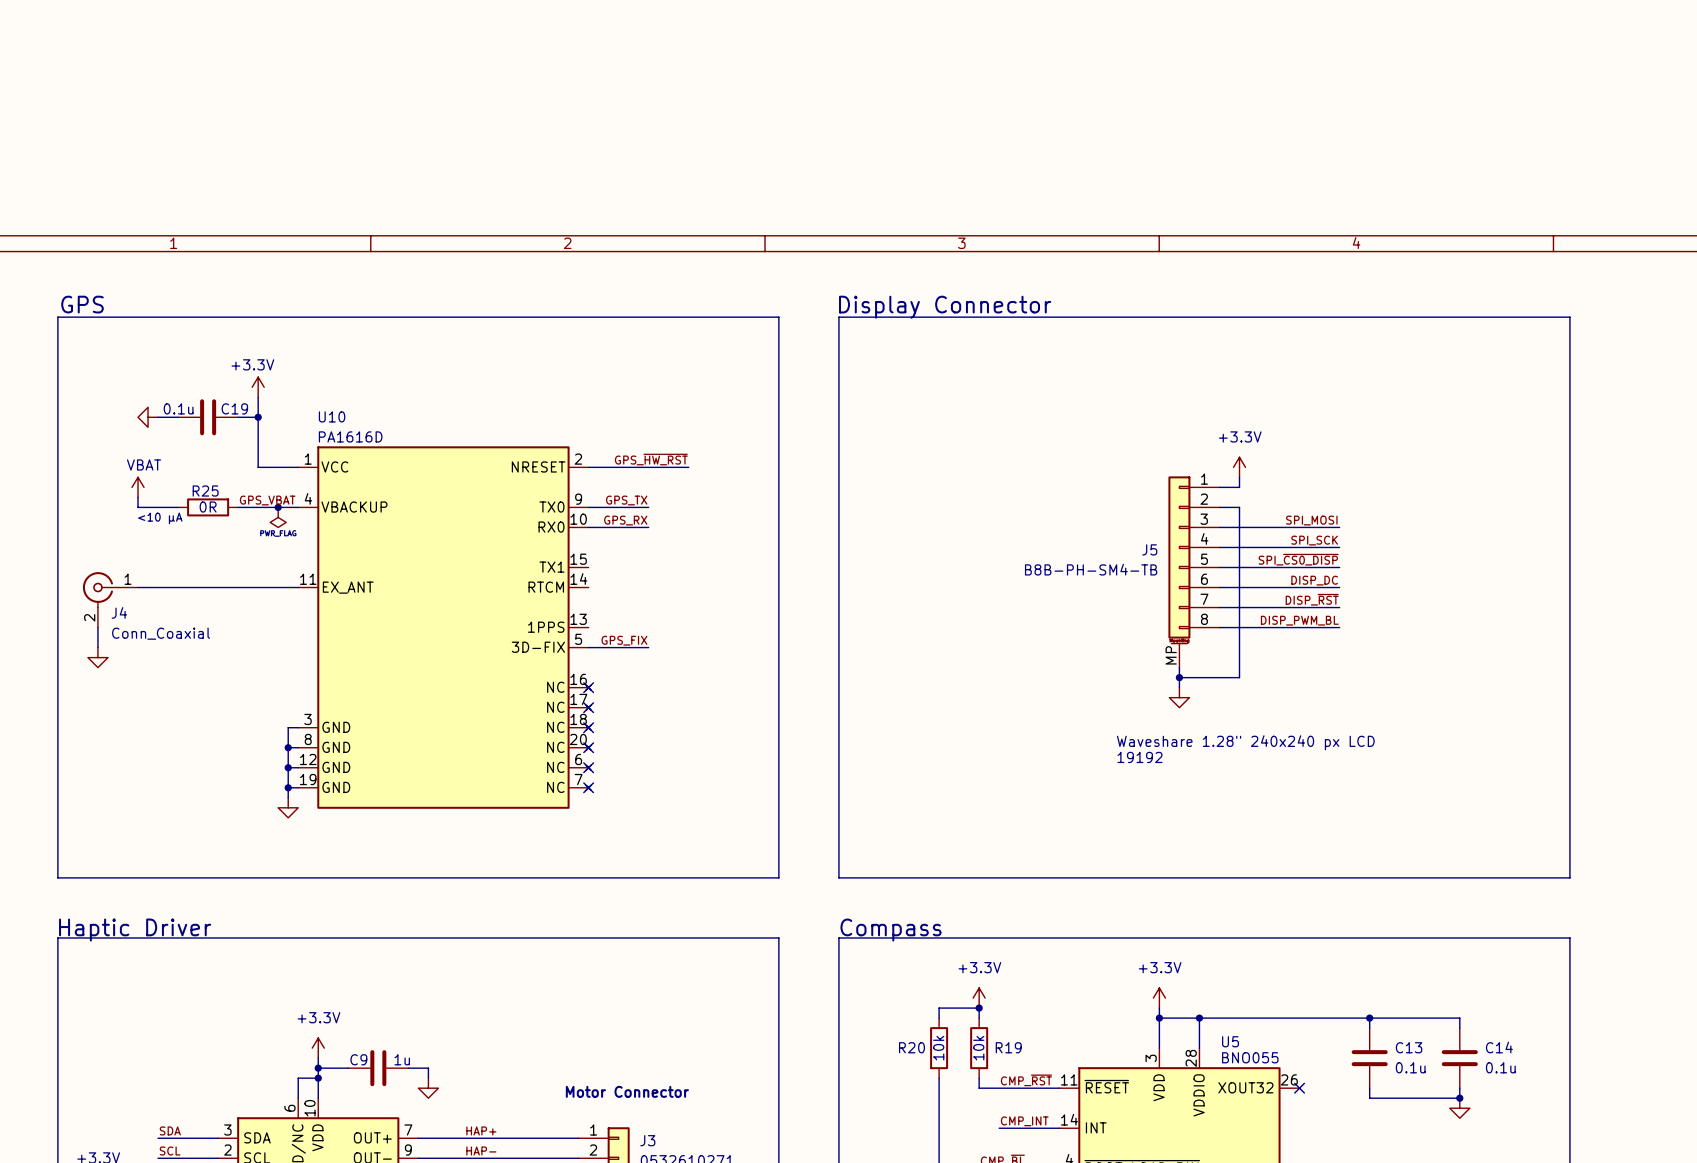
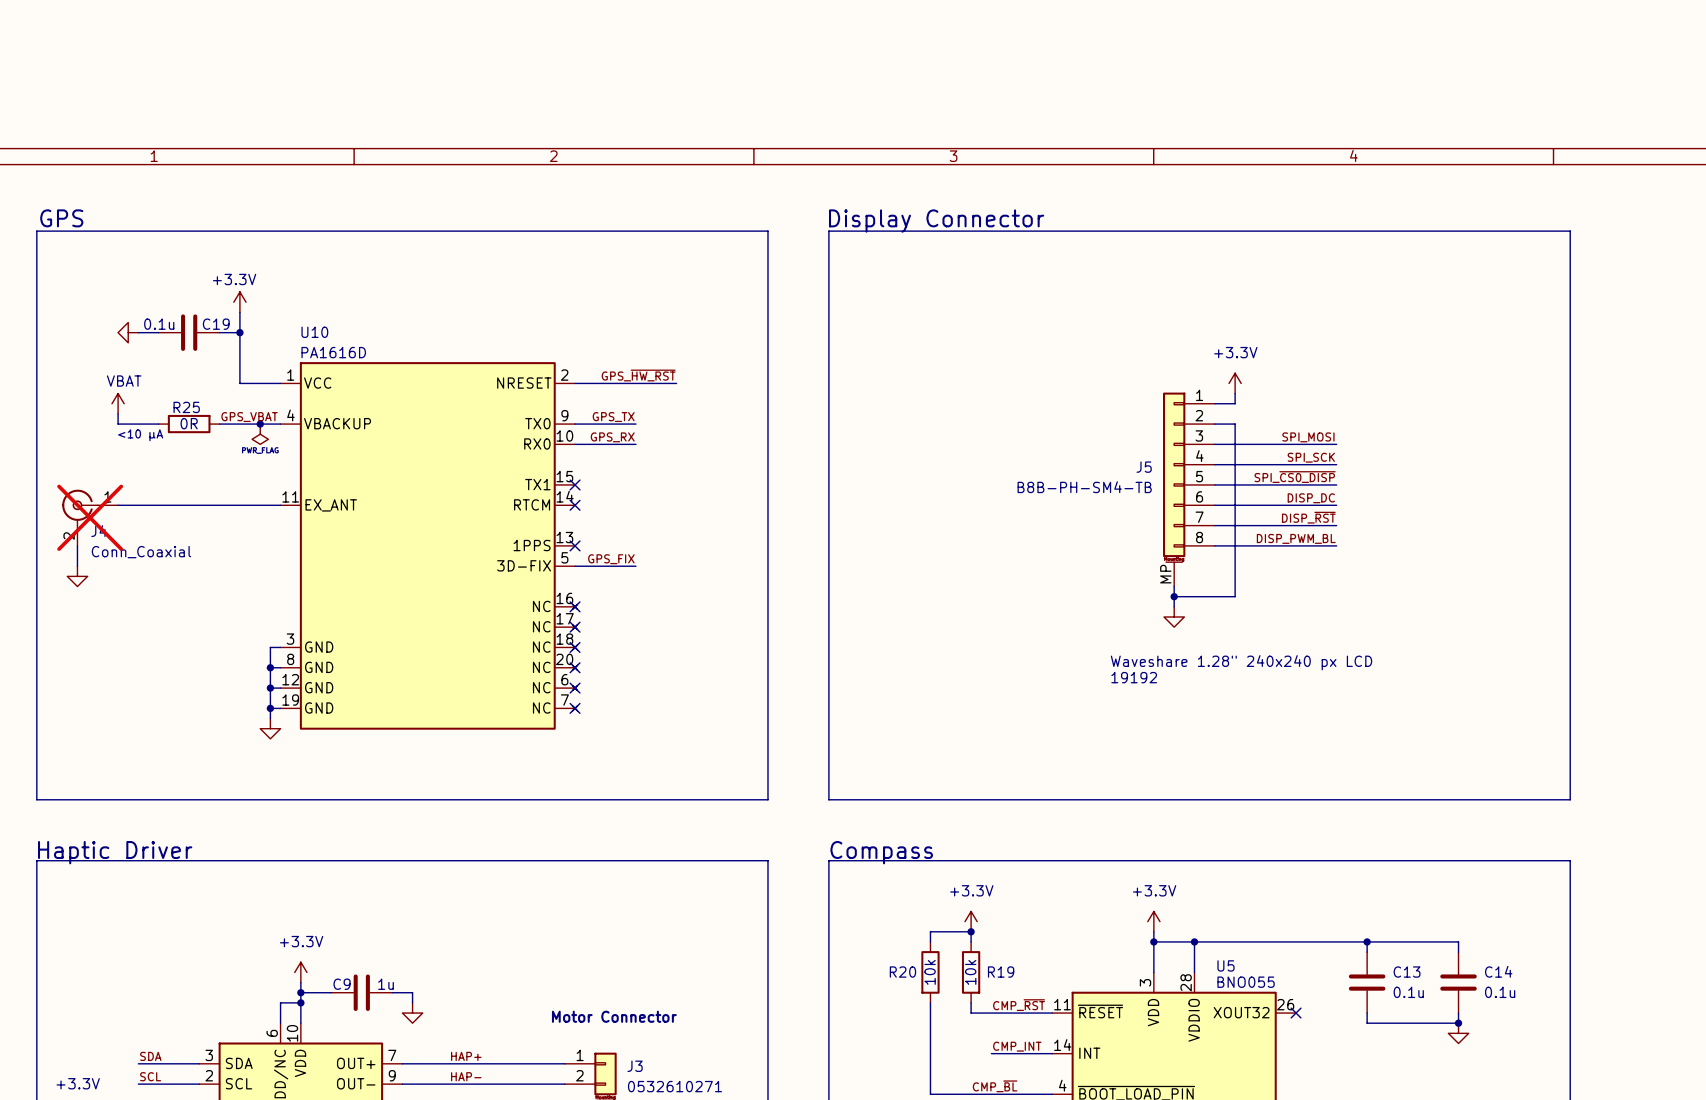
no-connect mark: none -> (575, 484)
no-connect mark: none -> (575, 505)
J4 do-not-place cross: none -> (90, 517)
no-connect mark: none -> (575, 545)

